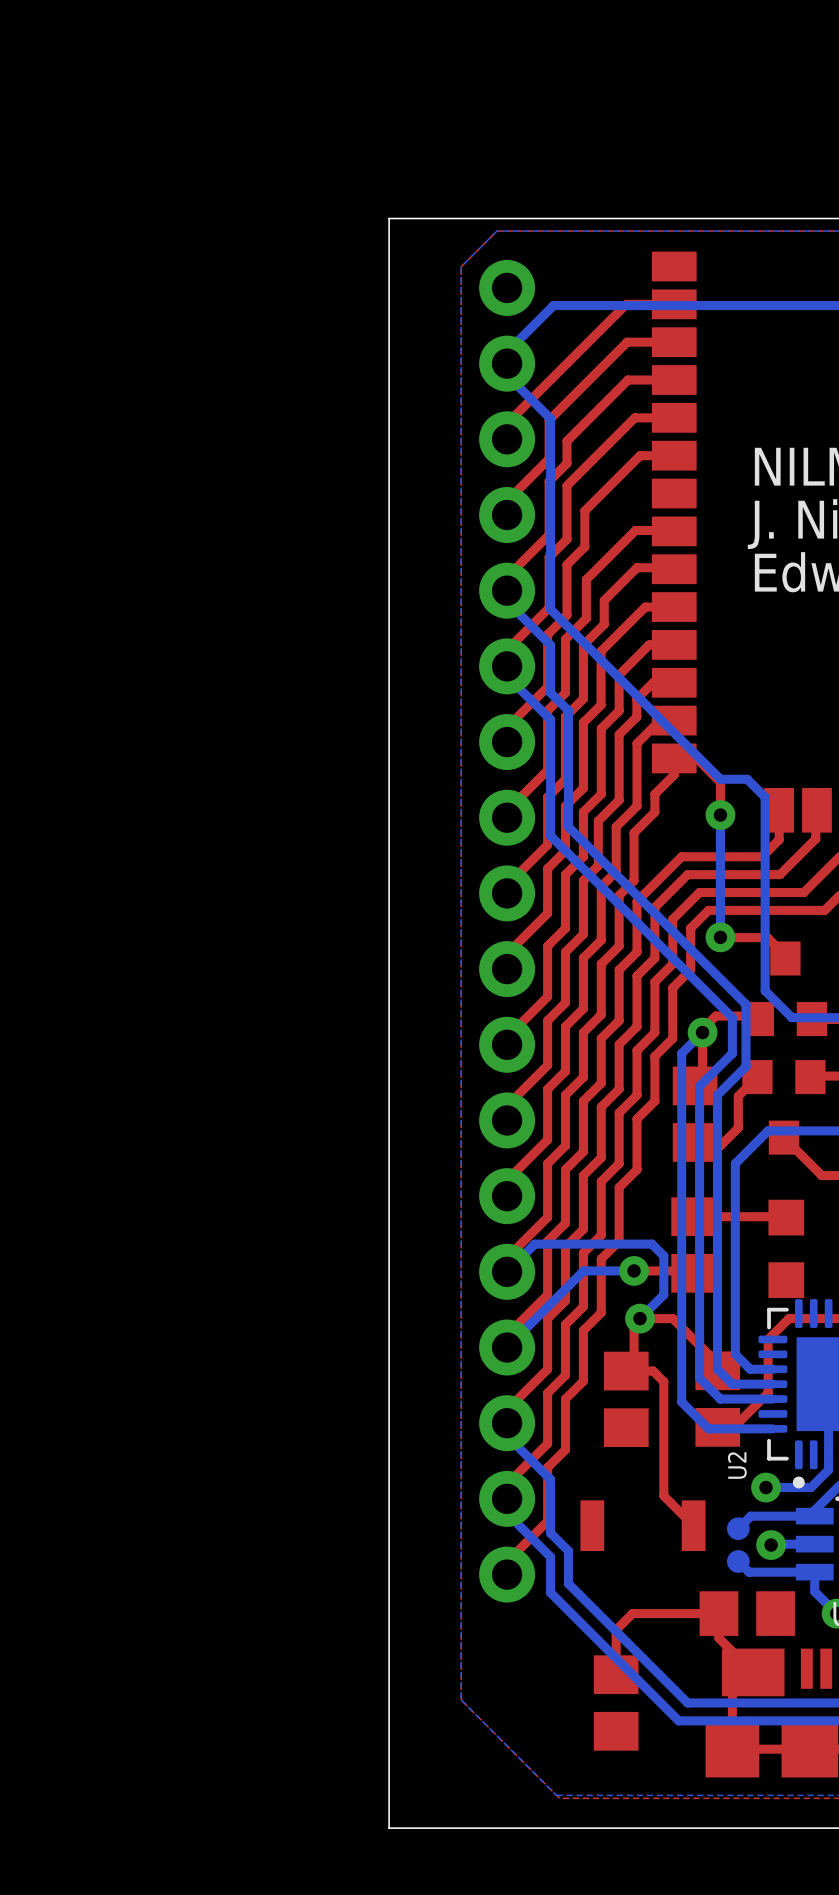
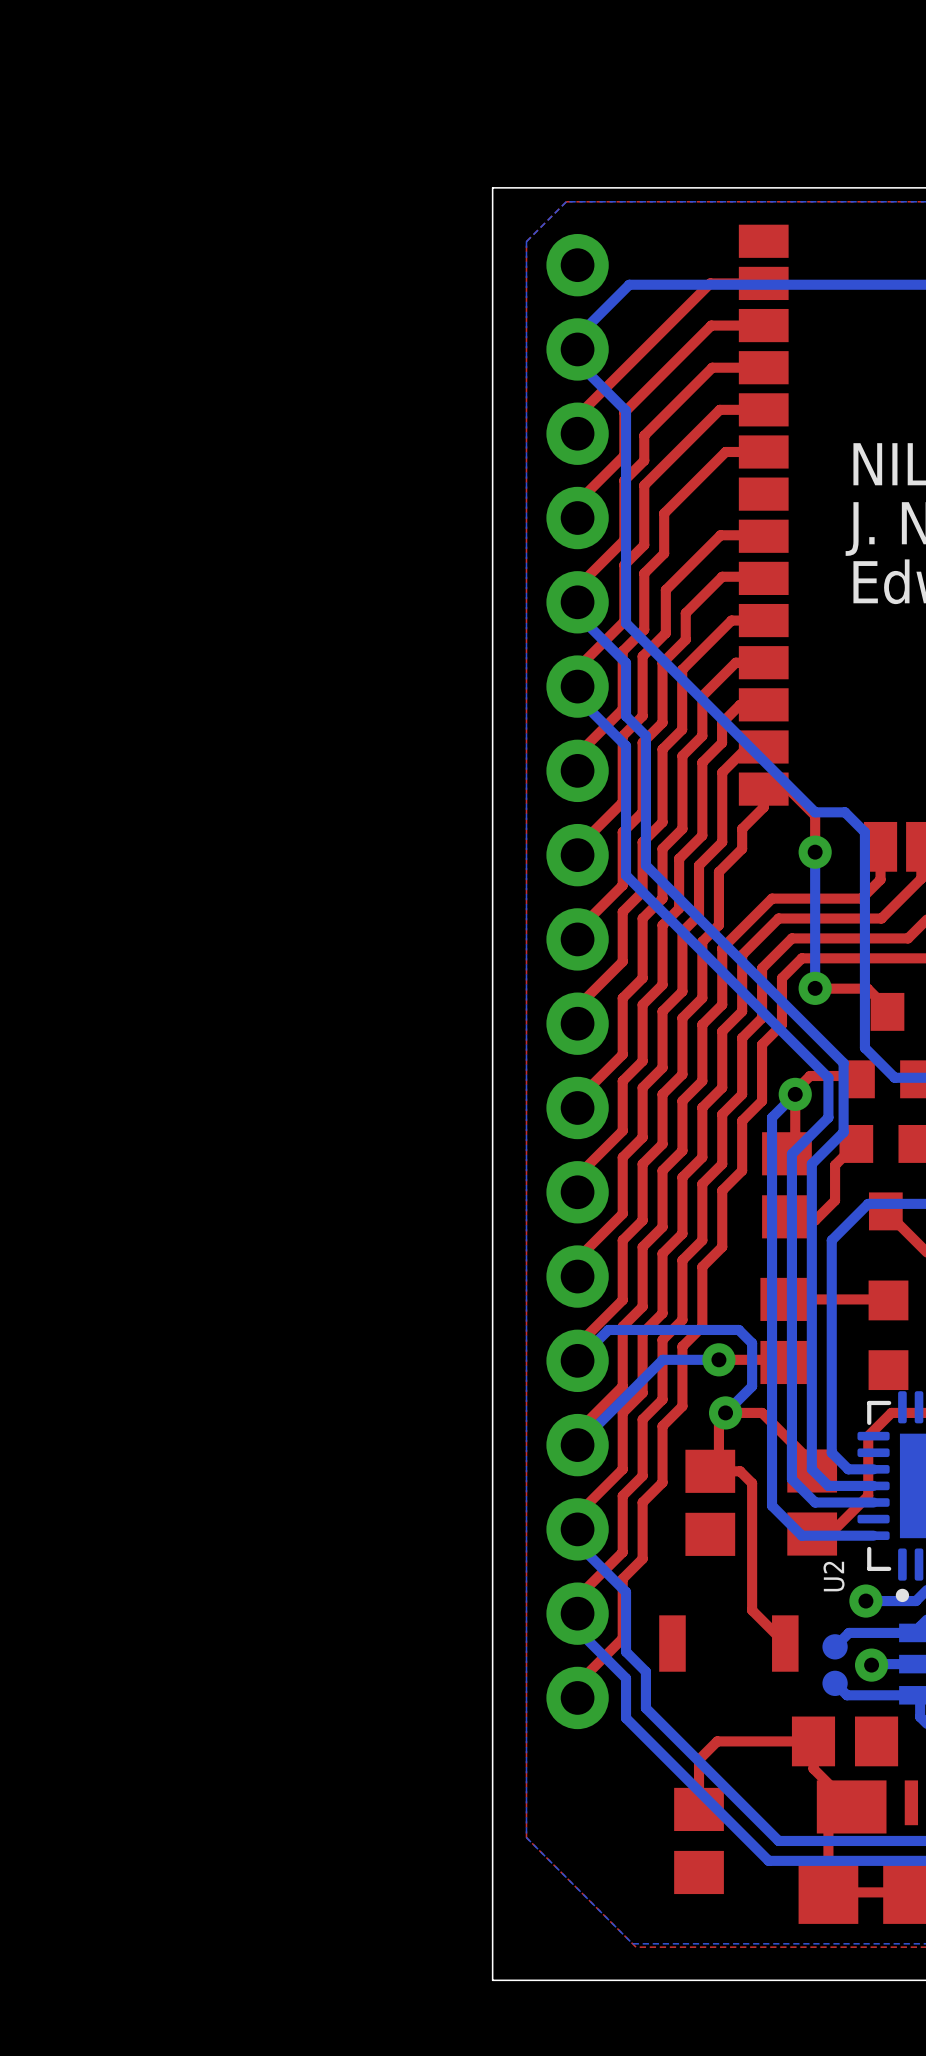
board edge: (430, 218) (389, 218) (389, 1828) (430, 1828) -> (492, 187) (492, 1980)

